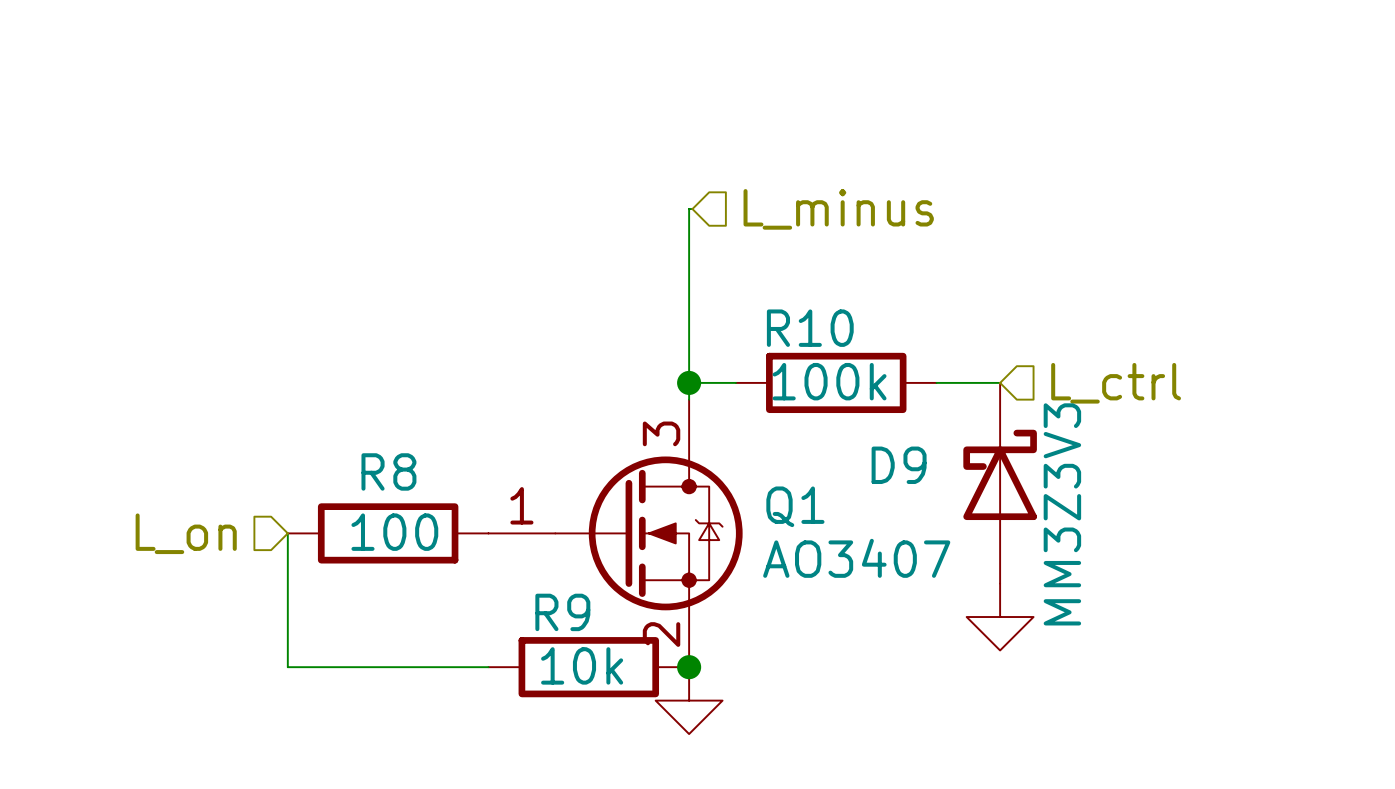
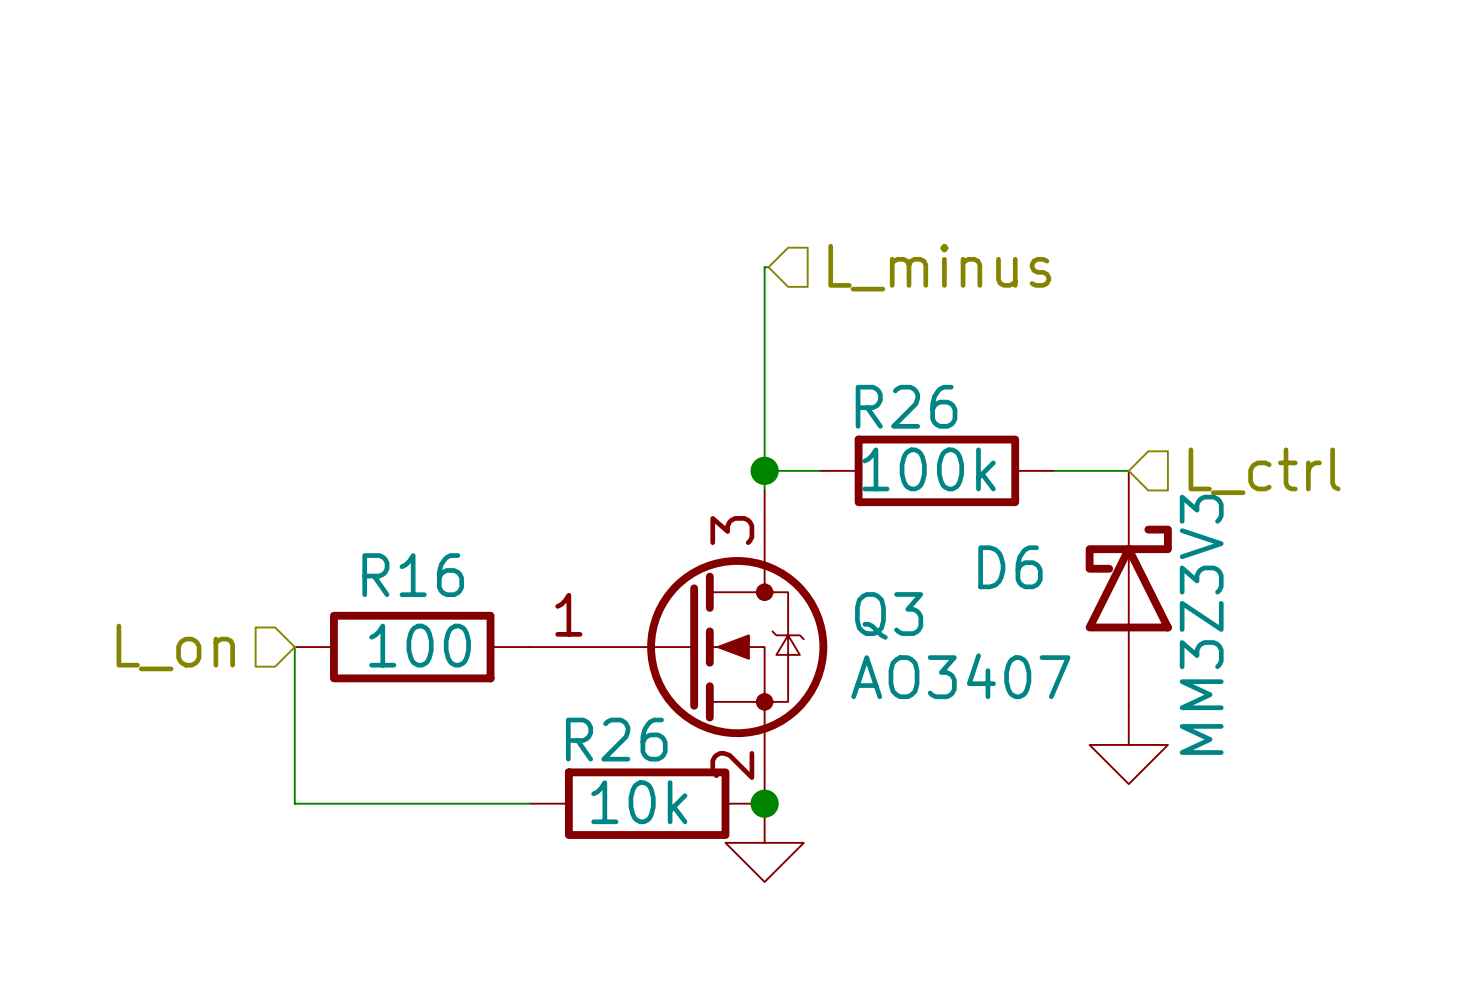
R10 name: R10 (810, 328) -> R26 (906, 406)
D9 name: D9 (899, 465) -> D6 (1010, 567)
R8 name: R8 (388, 471) -> R16 (413, 575)
Q1 name: Q1 (795, 506) -> Q3 (889, 615)
R9 name: R9 (562, 612) -> R26 (616, 739)

